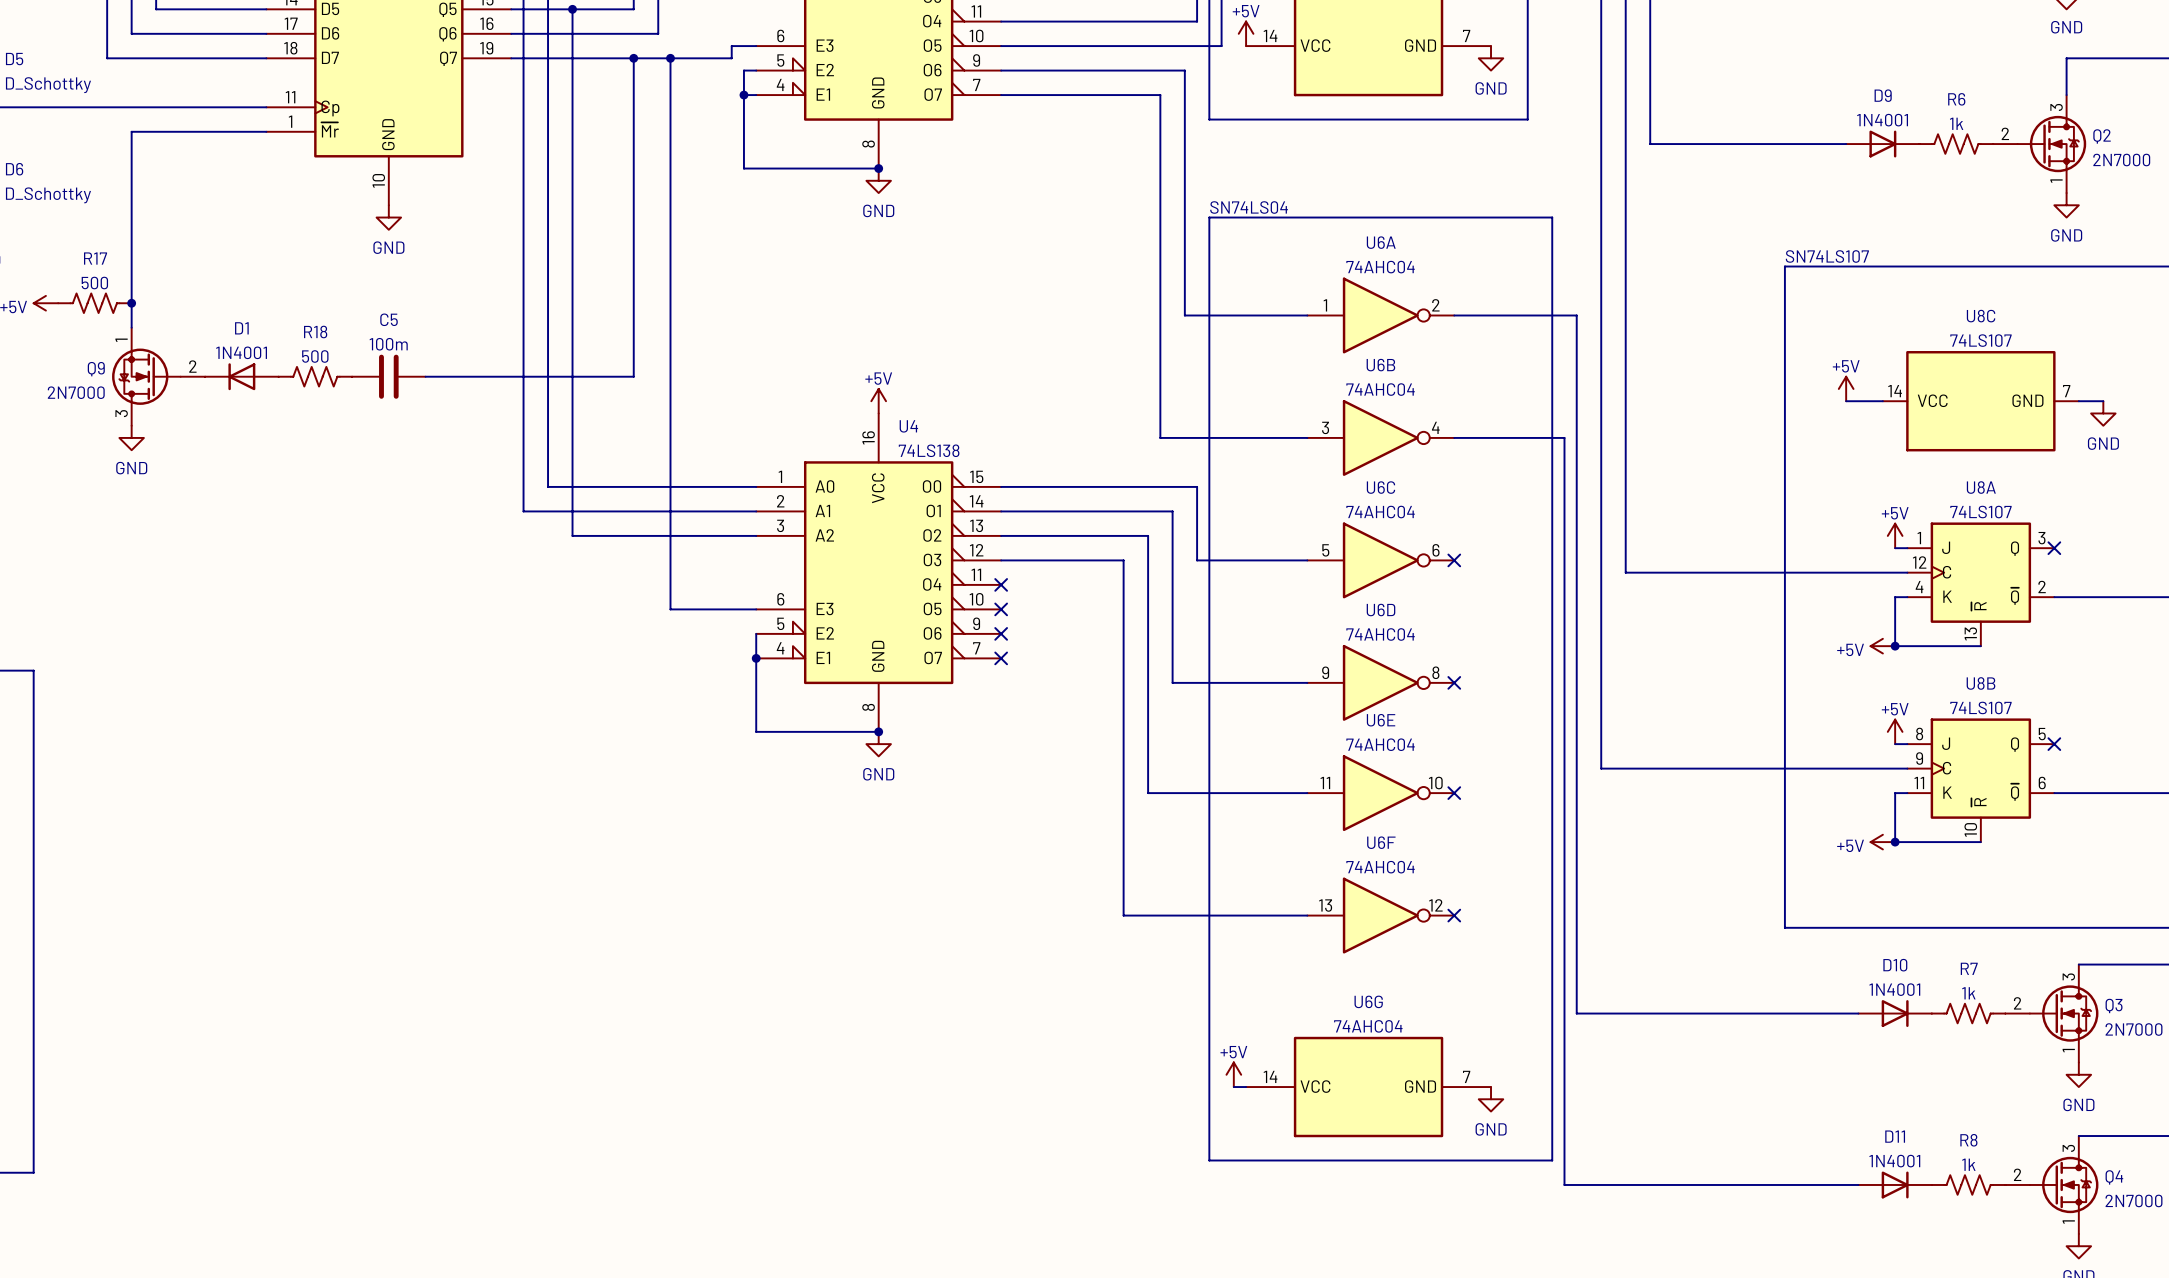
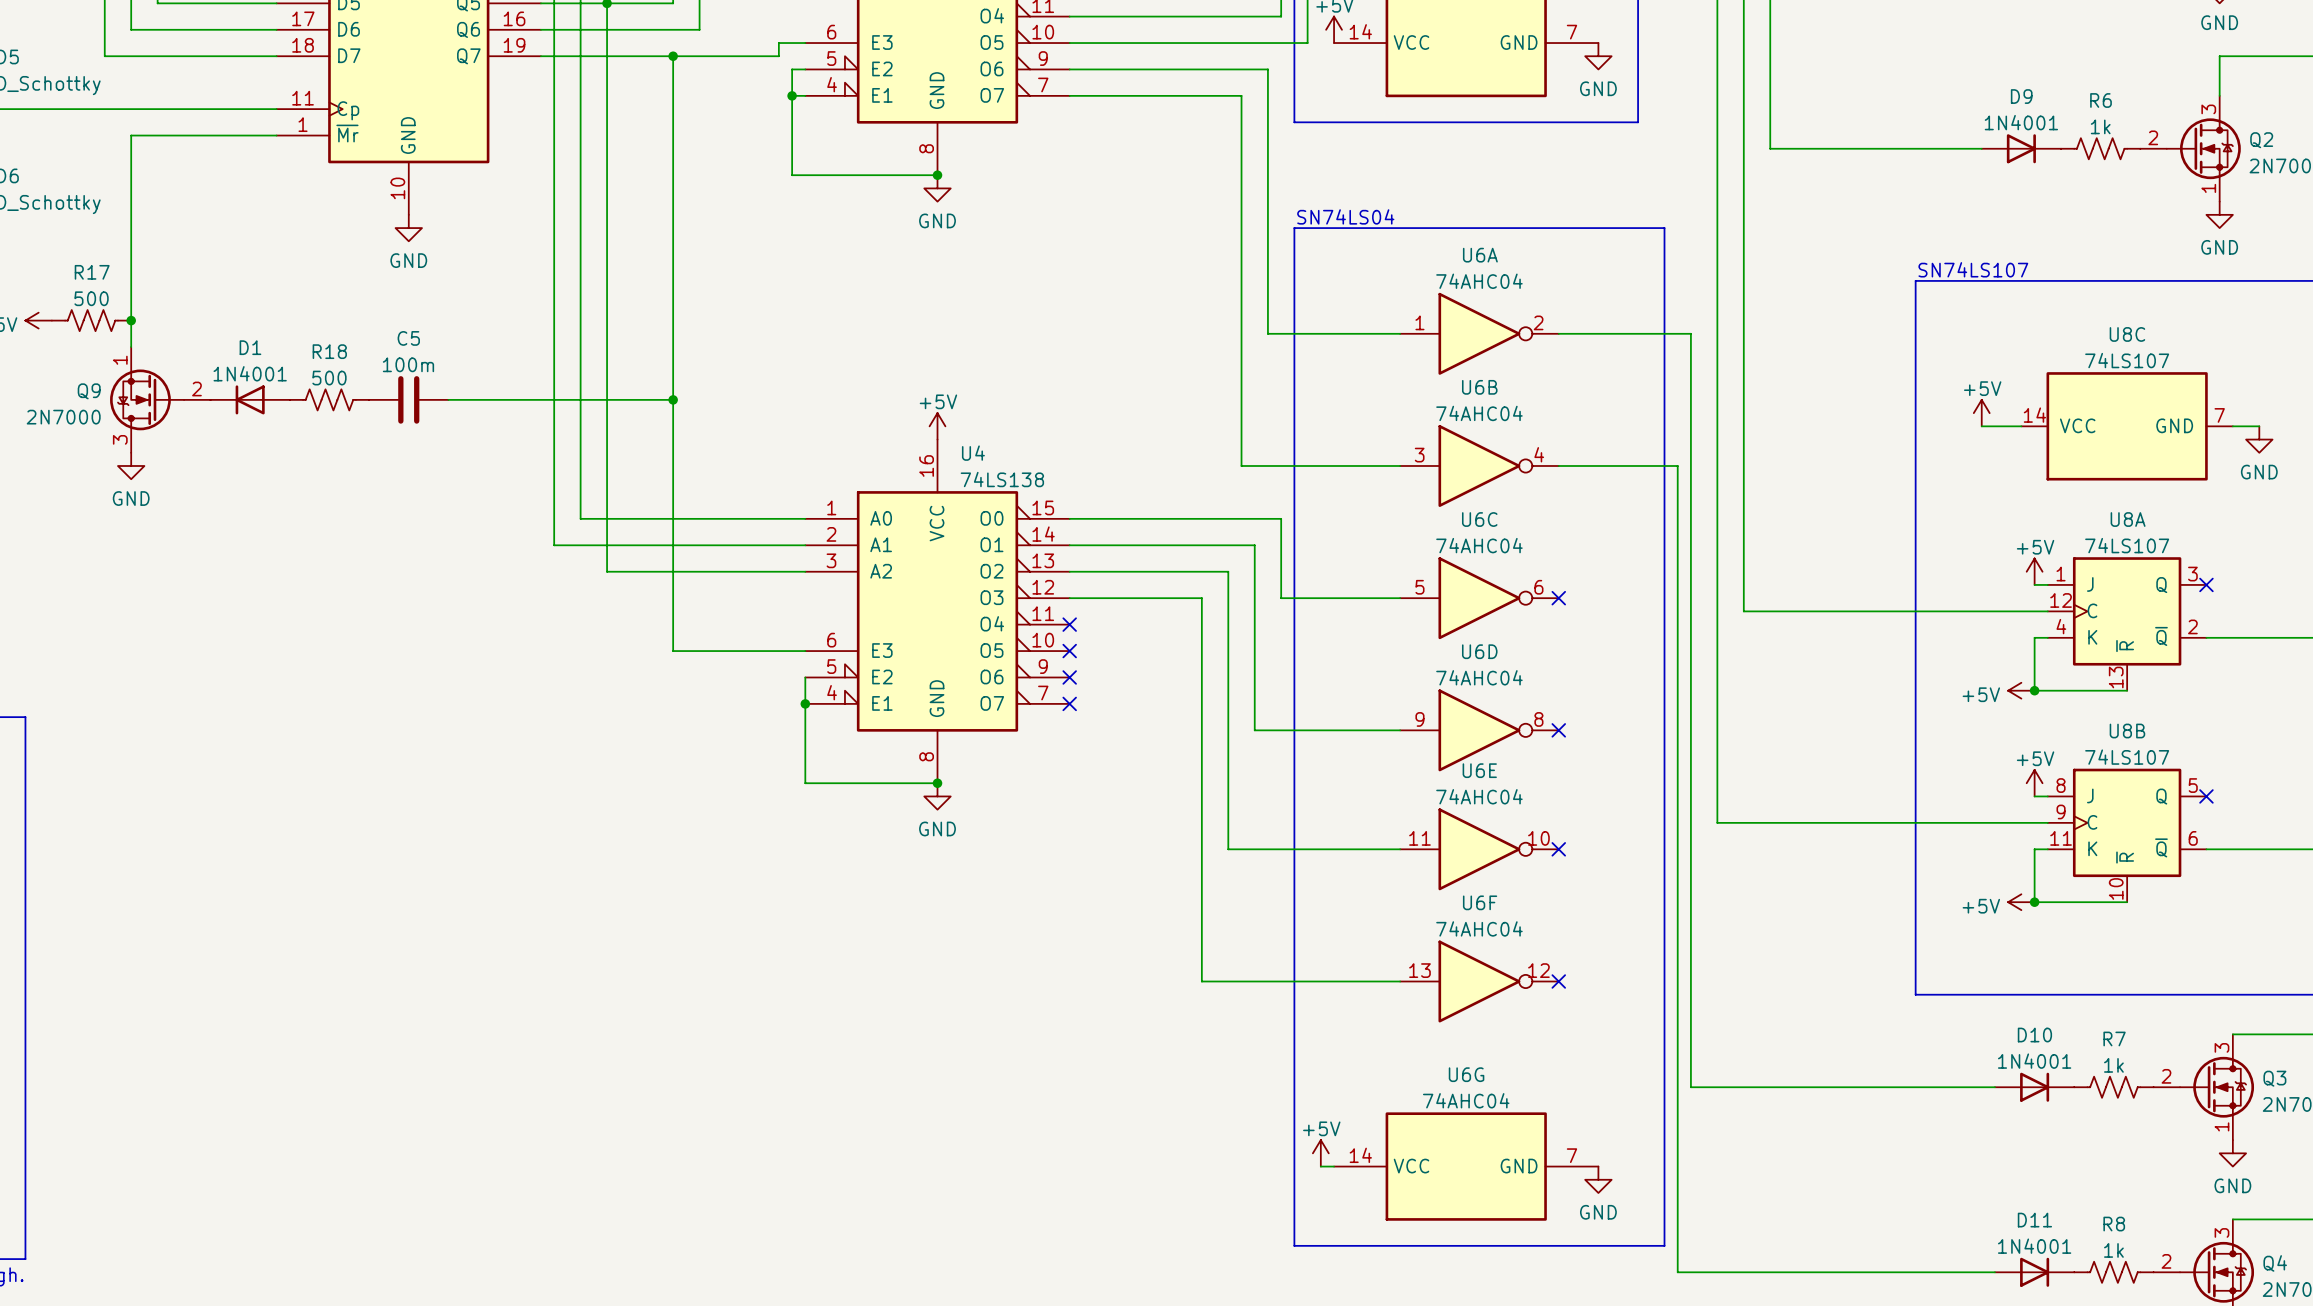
wire: (670, 58) (670, 609) -> (673, 399) (673, 651) (712, 651)
junction: (670, 58) -> none
junction: none -> (673, 399)

